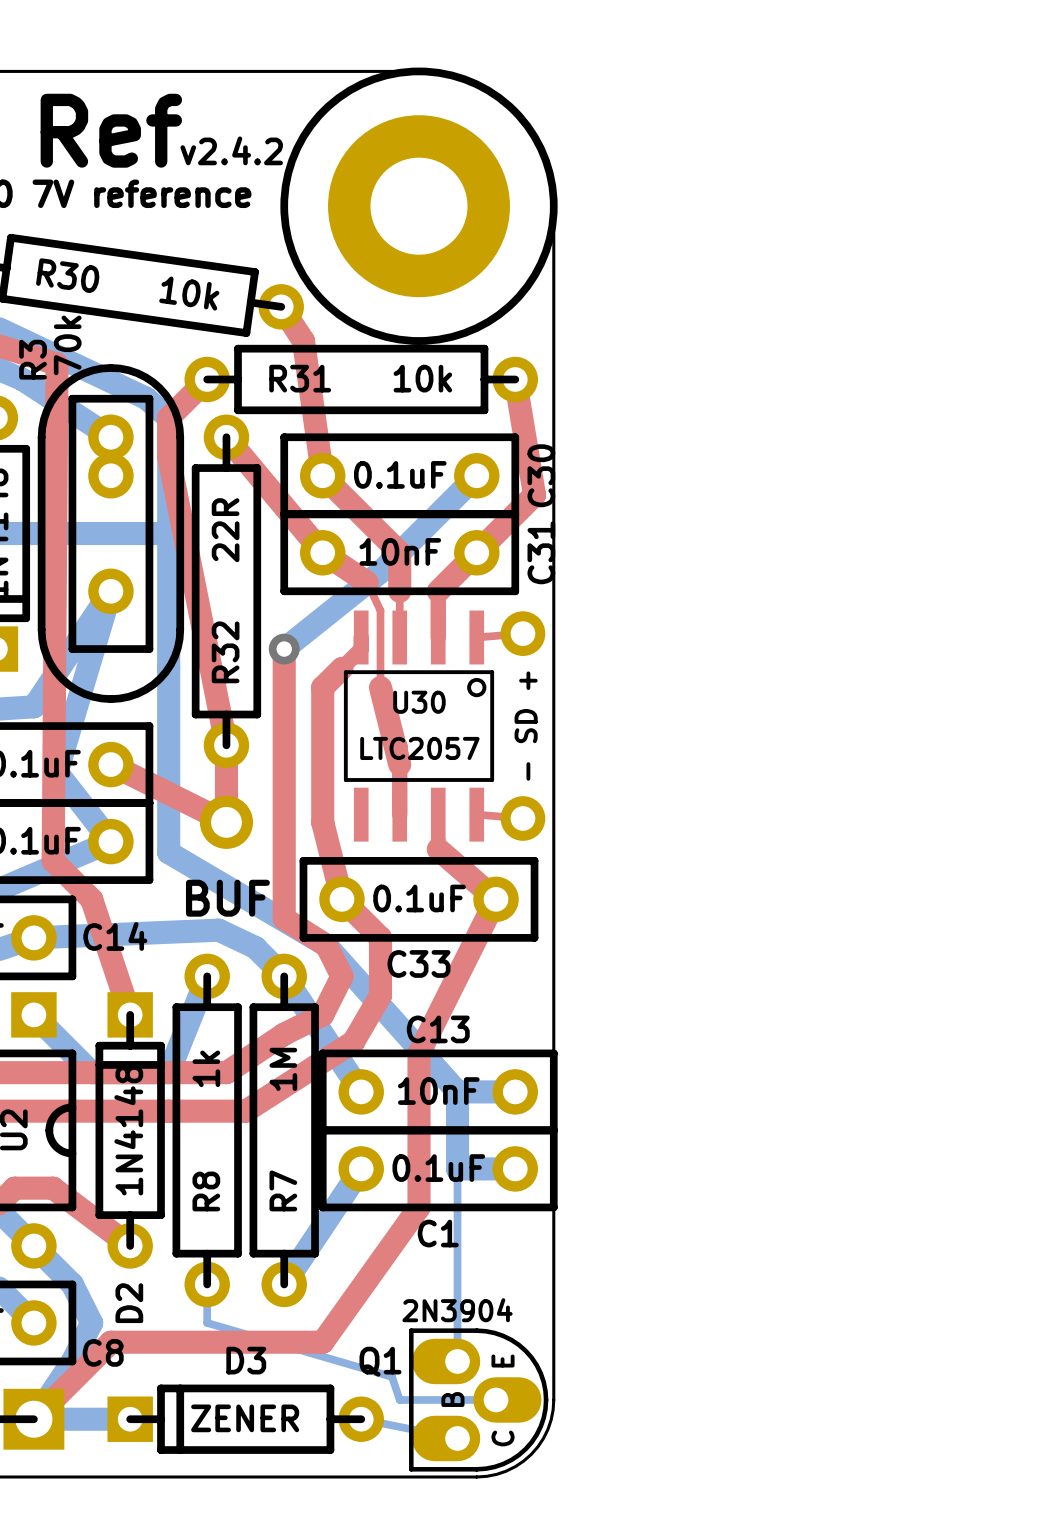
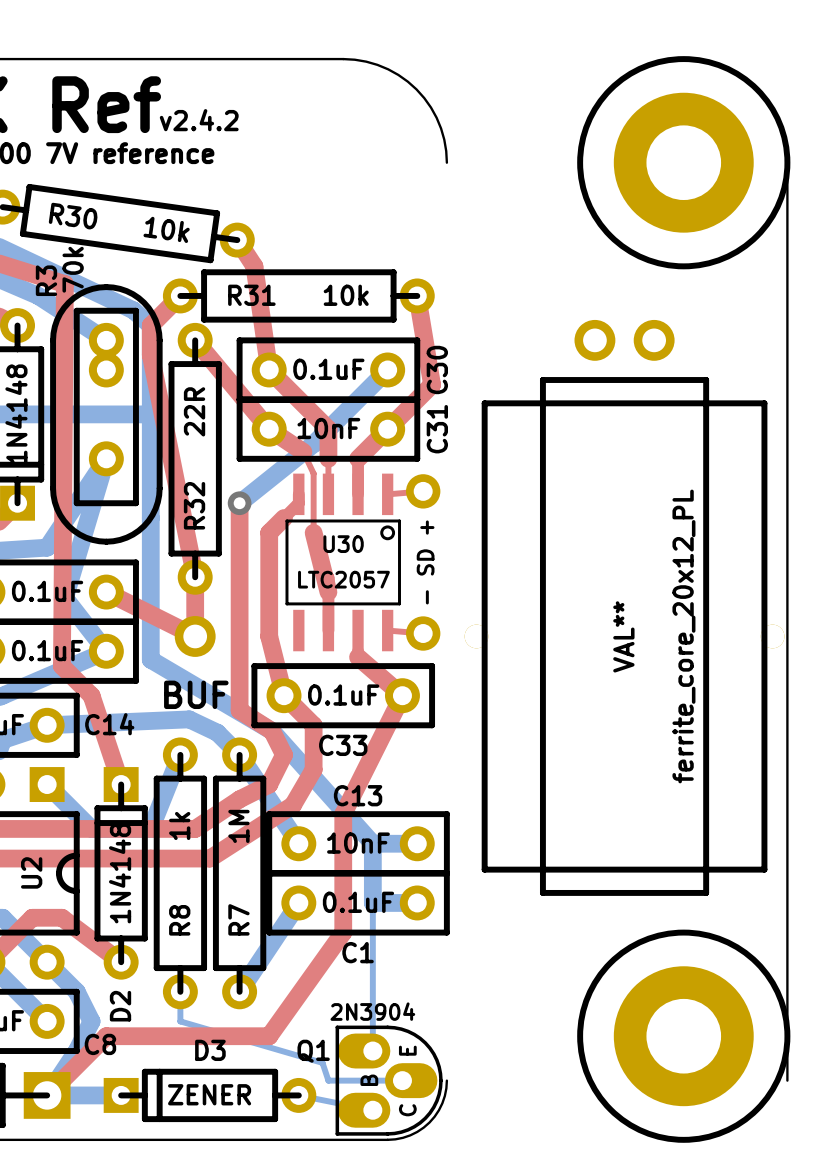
part position: (419, 206) -> (683, 162)
board edge: (553, 206) (553, 1399) -> (787, 162) (787, 1080)
ferrite_core_20x12_PL: none -> VAL** (624, 607)
part: none -> (683, 1036)

